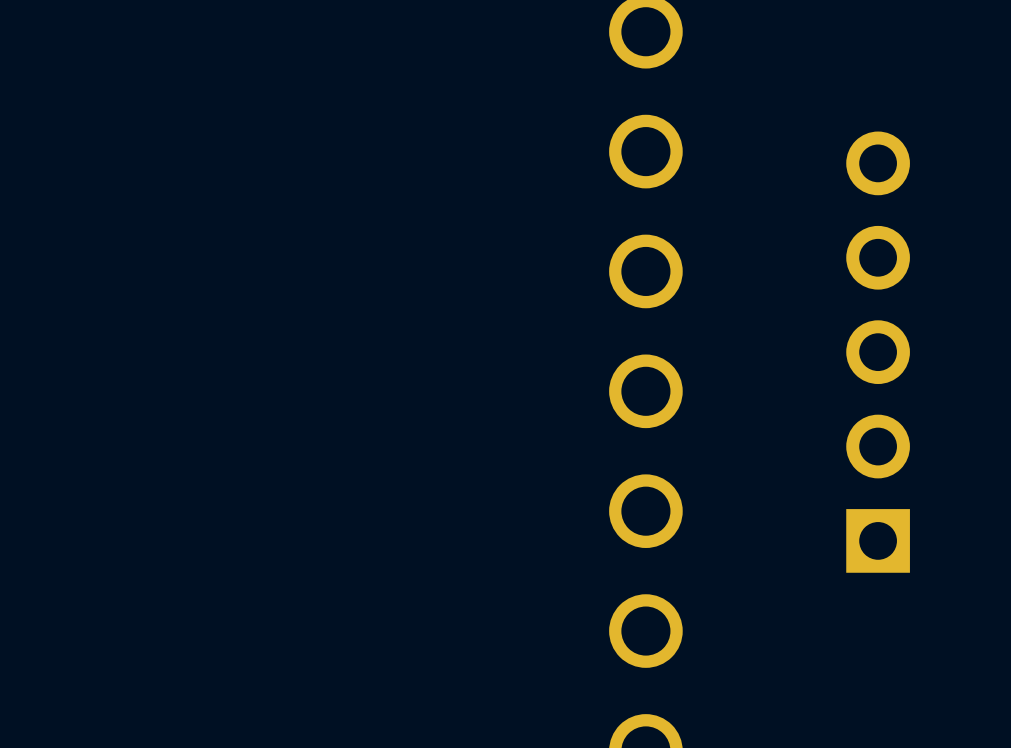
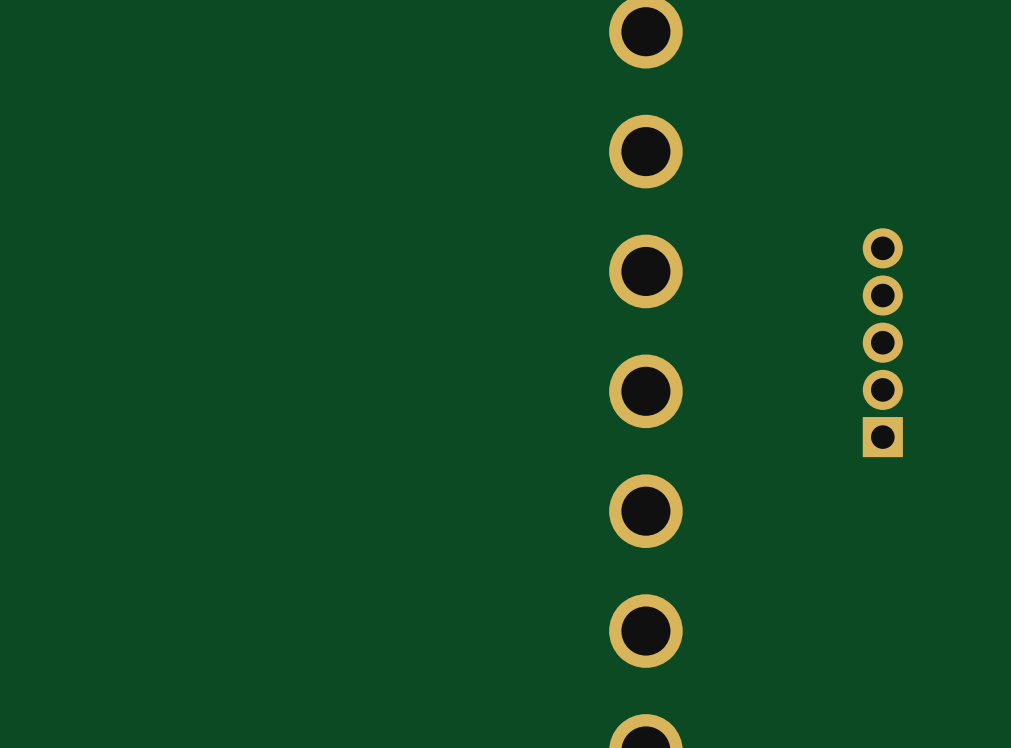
part footprint: [846, 131, 910, 573] -> [862, 228, 903, 458]

